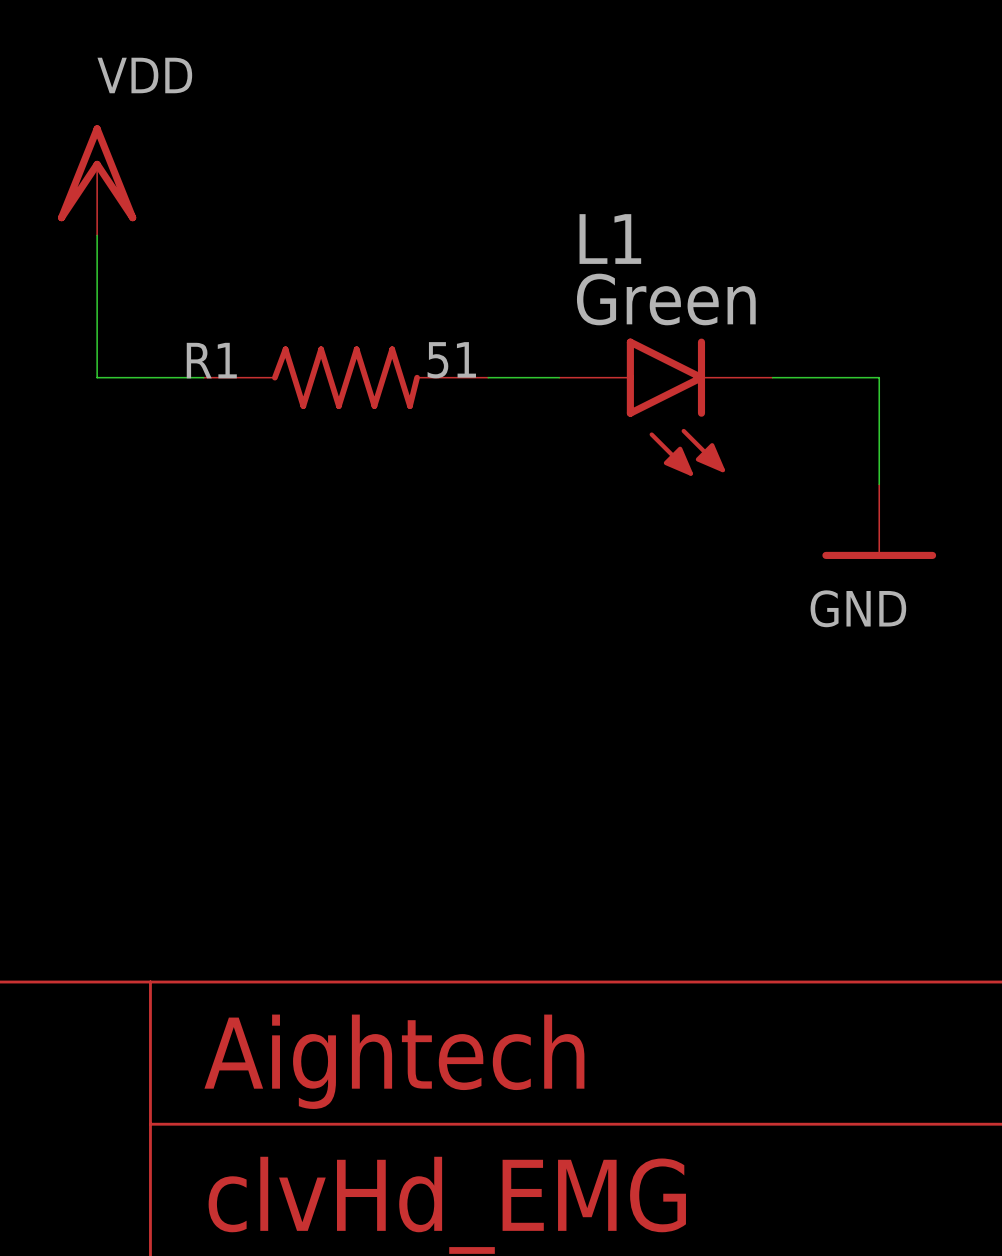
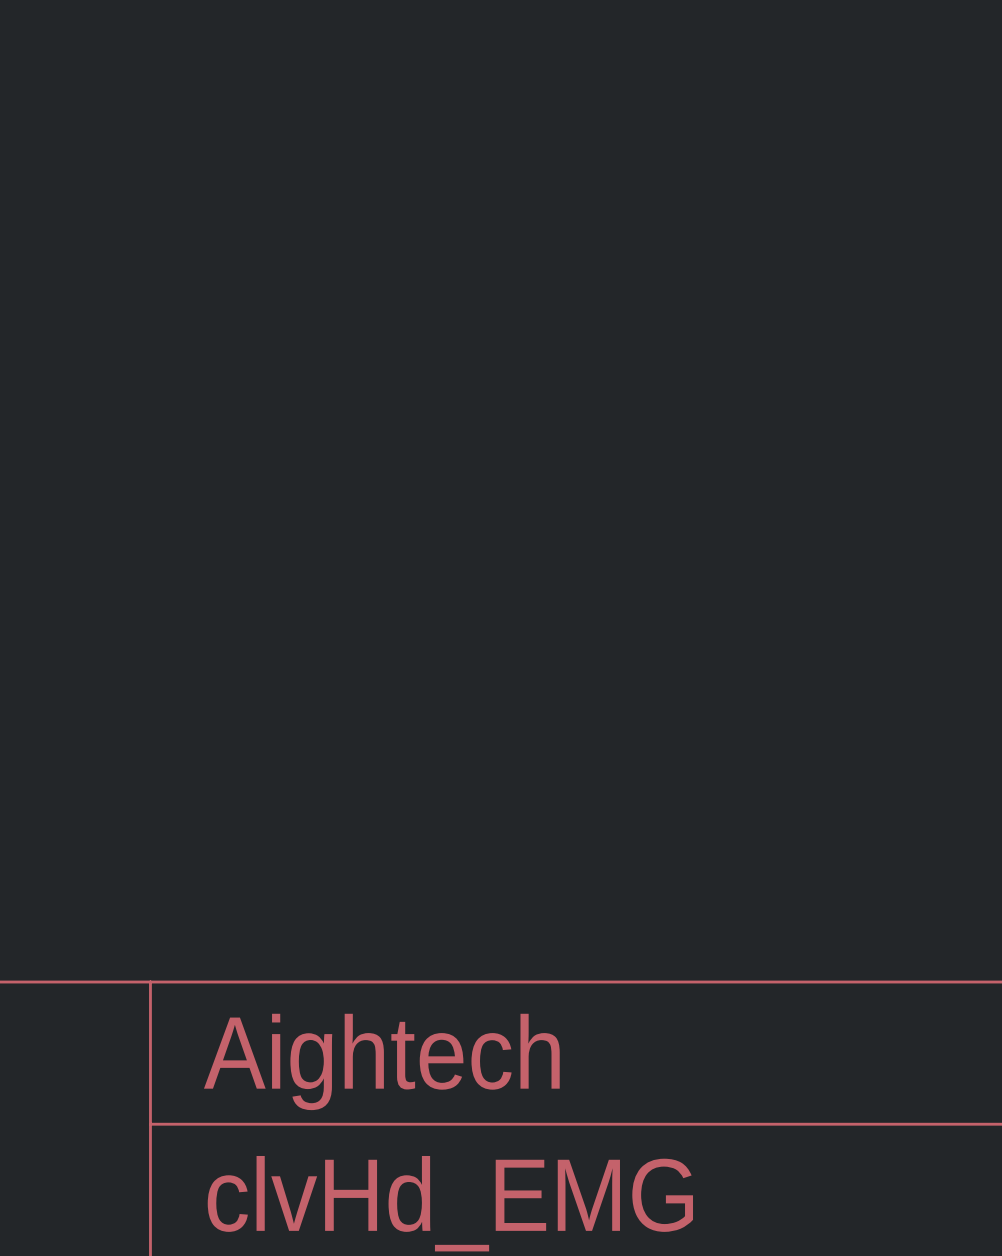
power symbol: VDD (97, 180) -> none
wire: (97, 235) (97, 377) (203, 377) -> none
R1: 51 (345, 377) -> none
wire: (488, 377) (559, 377) -> none
wire: (772, 377) (879, 377) (879, 484) -> none
L1: Green (665, 407) -> none
power symbol: GND (879, 521) -> none

